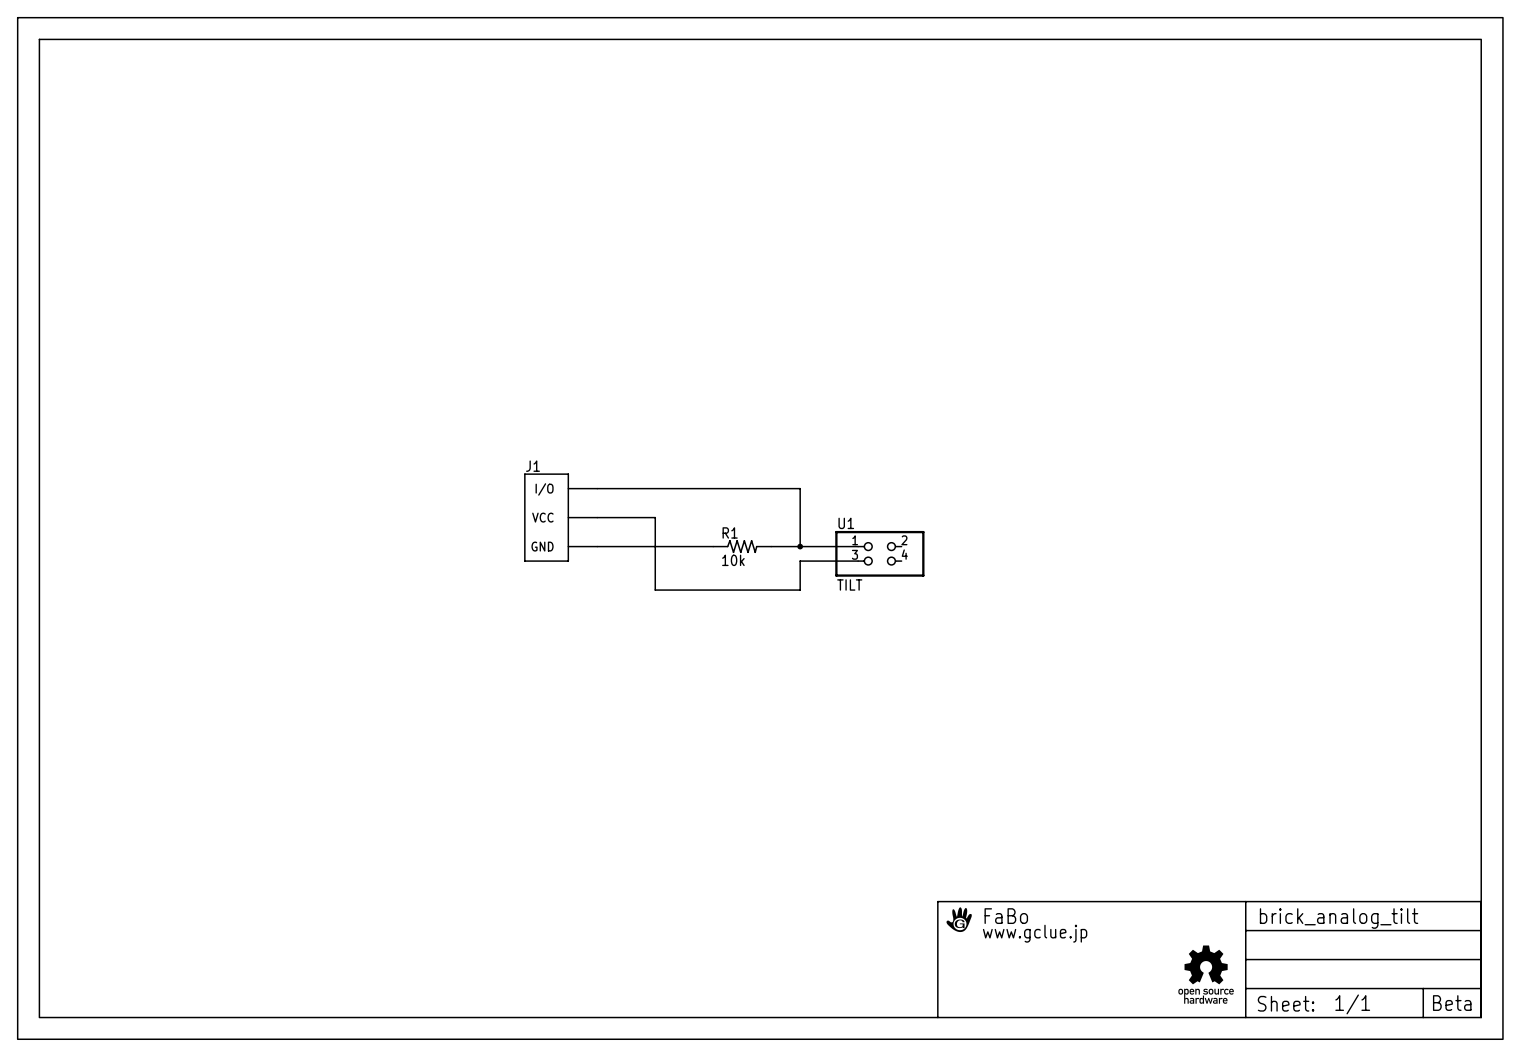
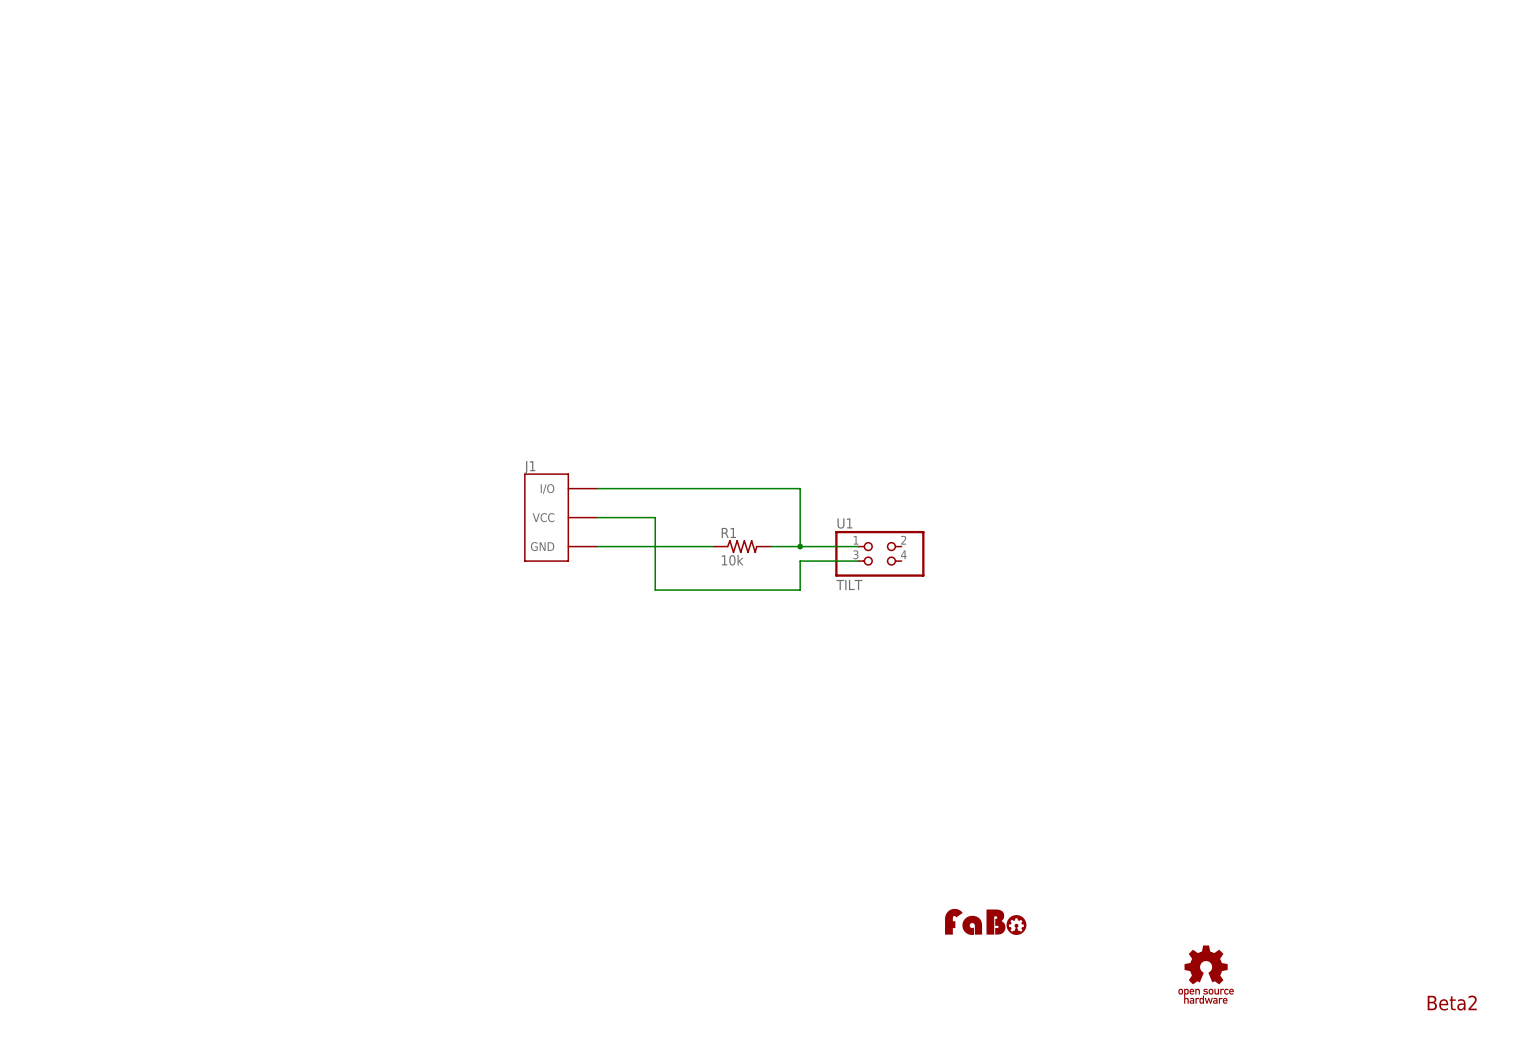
part: (760, 528) -> none
part: none -> (985, 921)
text: Beta (1452, 1003) -> Beta2 (1452, 1003)

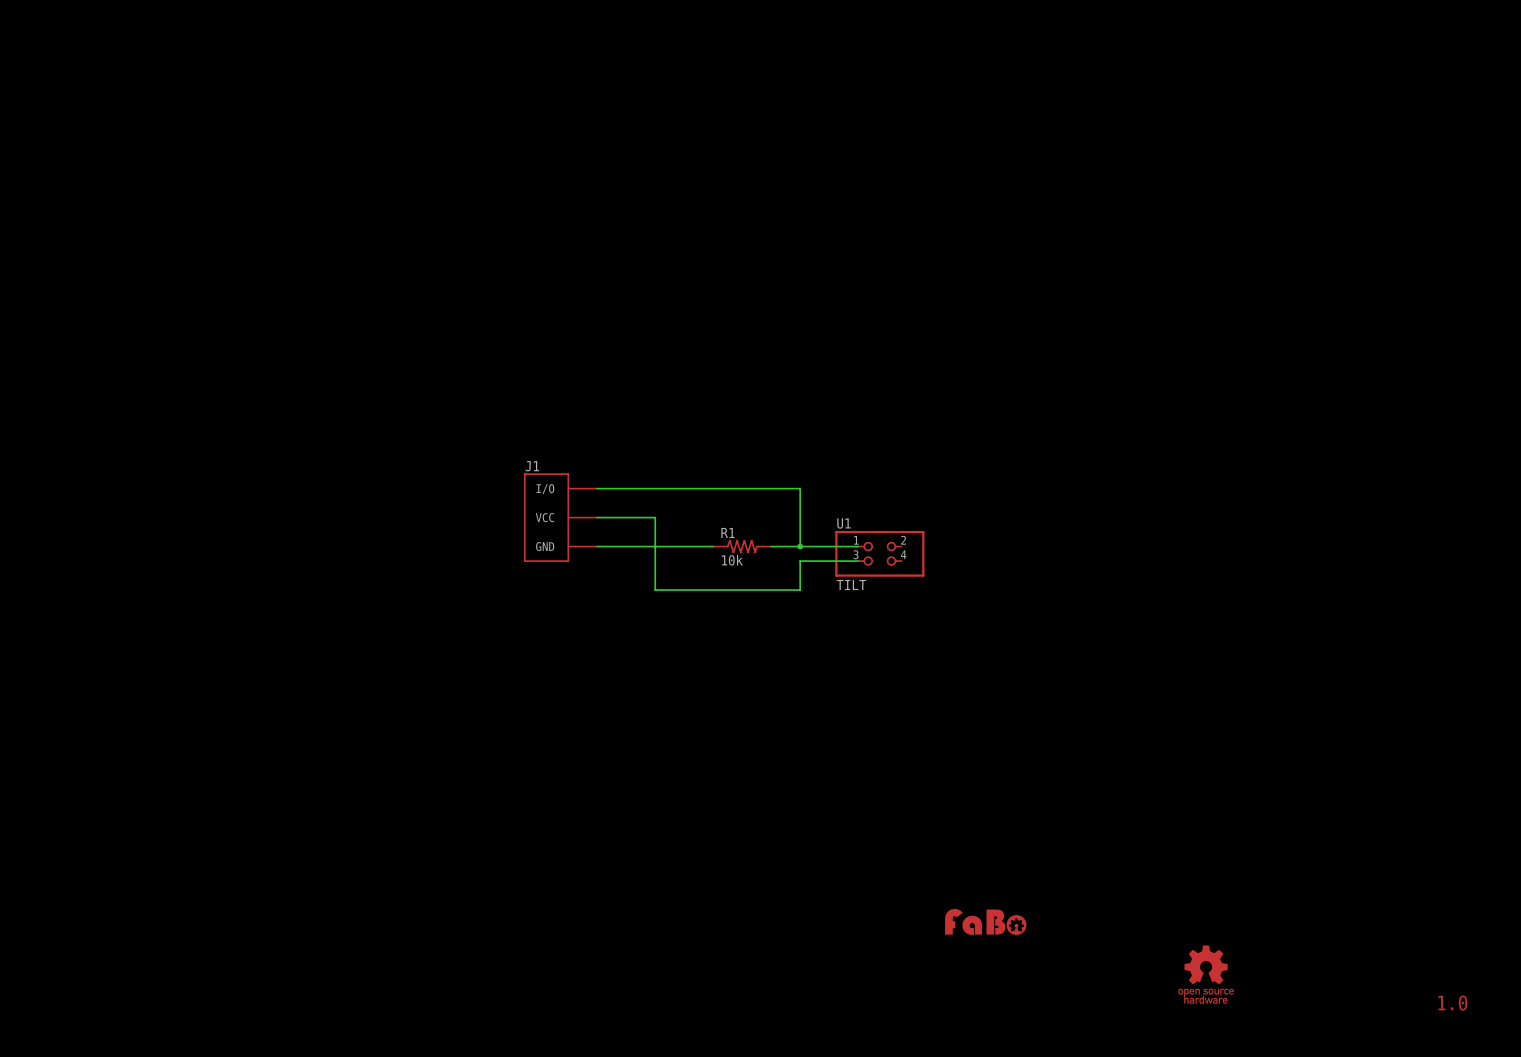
text: Beta2 (1452, 1003) -> 1.0 (1452, 1003)

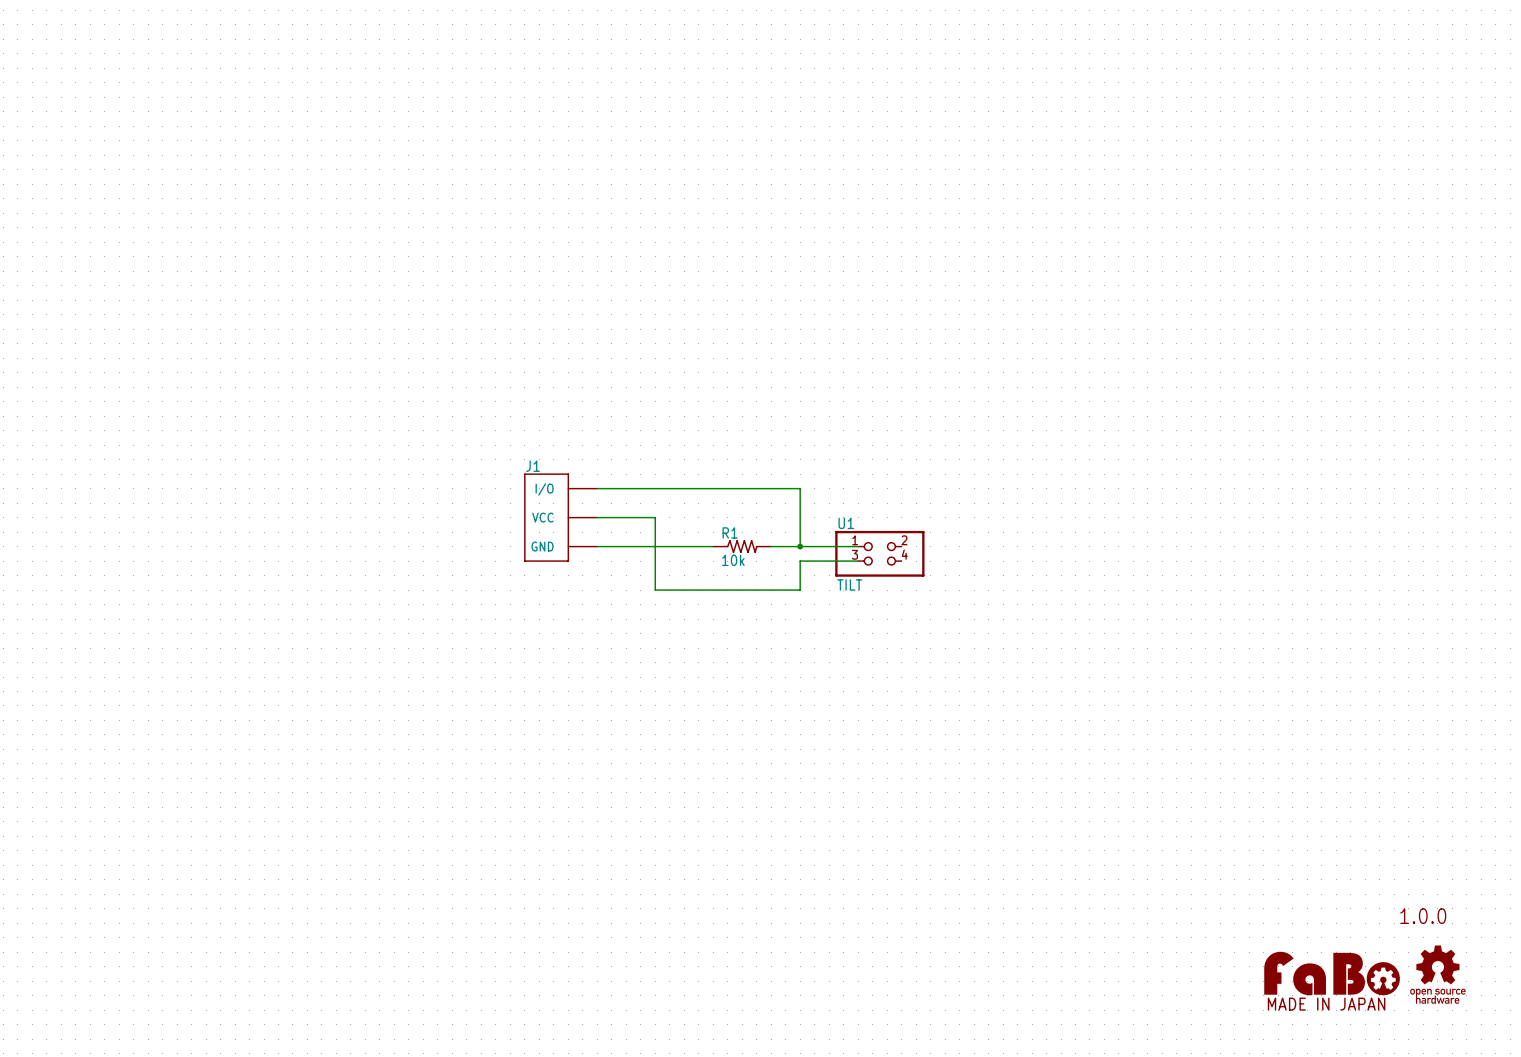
text: none -> 1.0.0 (1423, 916)
part: (985, 921) -> none
part: none -> (1332, 973)
part: (1206, 974) -> none
part: none -> (1437, 974)
text: 1.0 (1452, 1003) -> none

